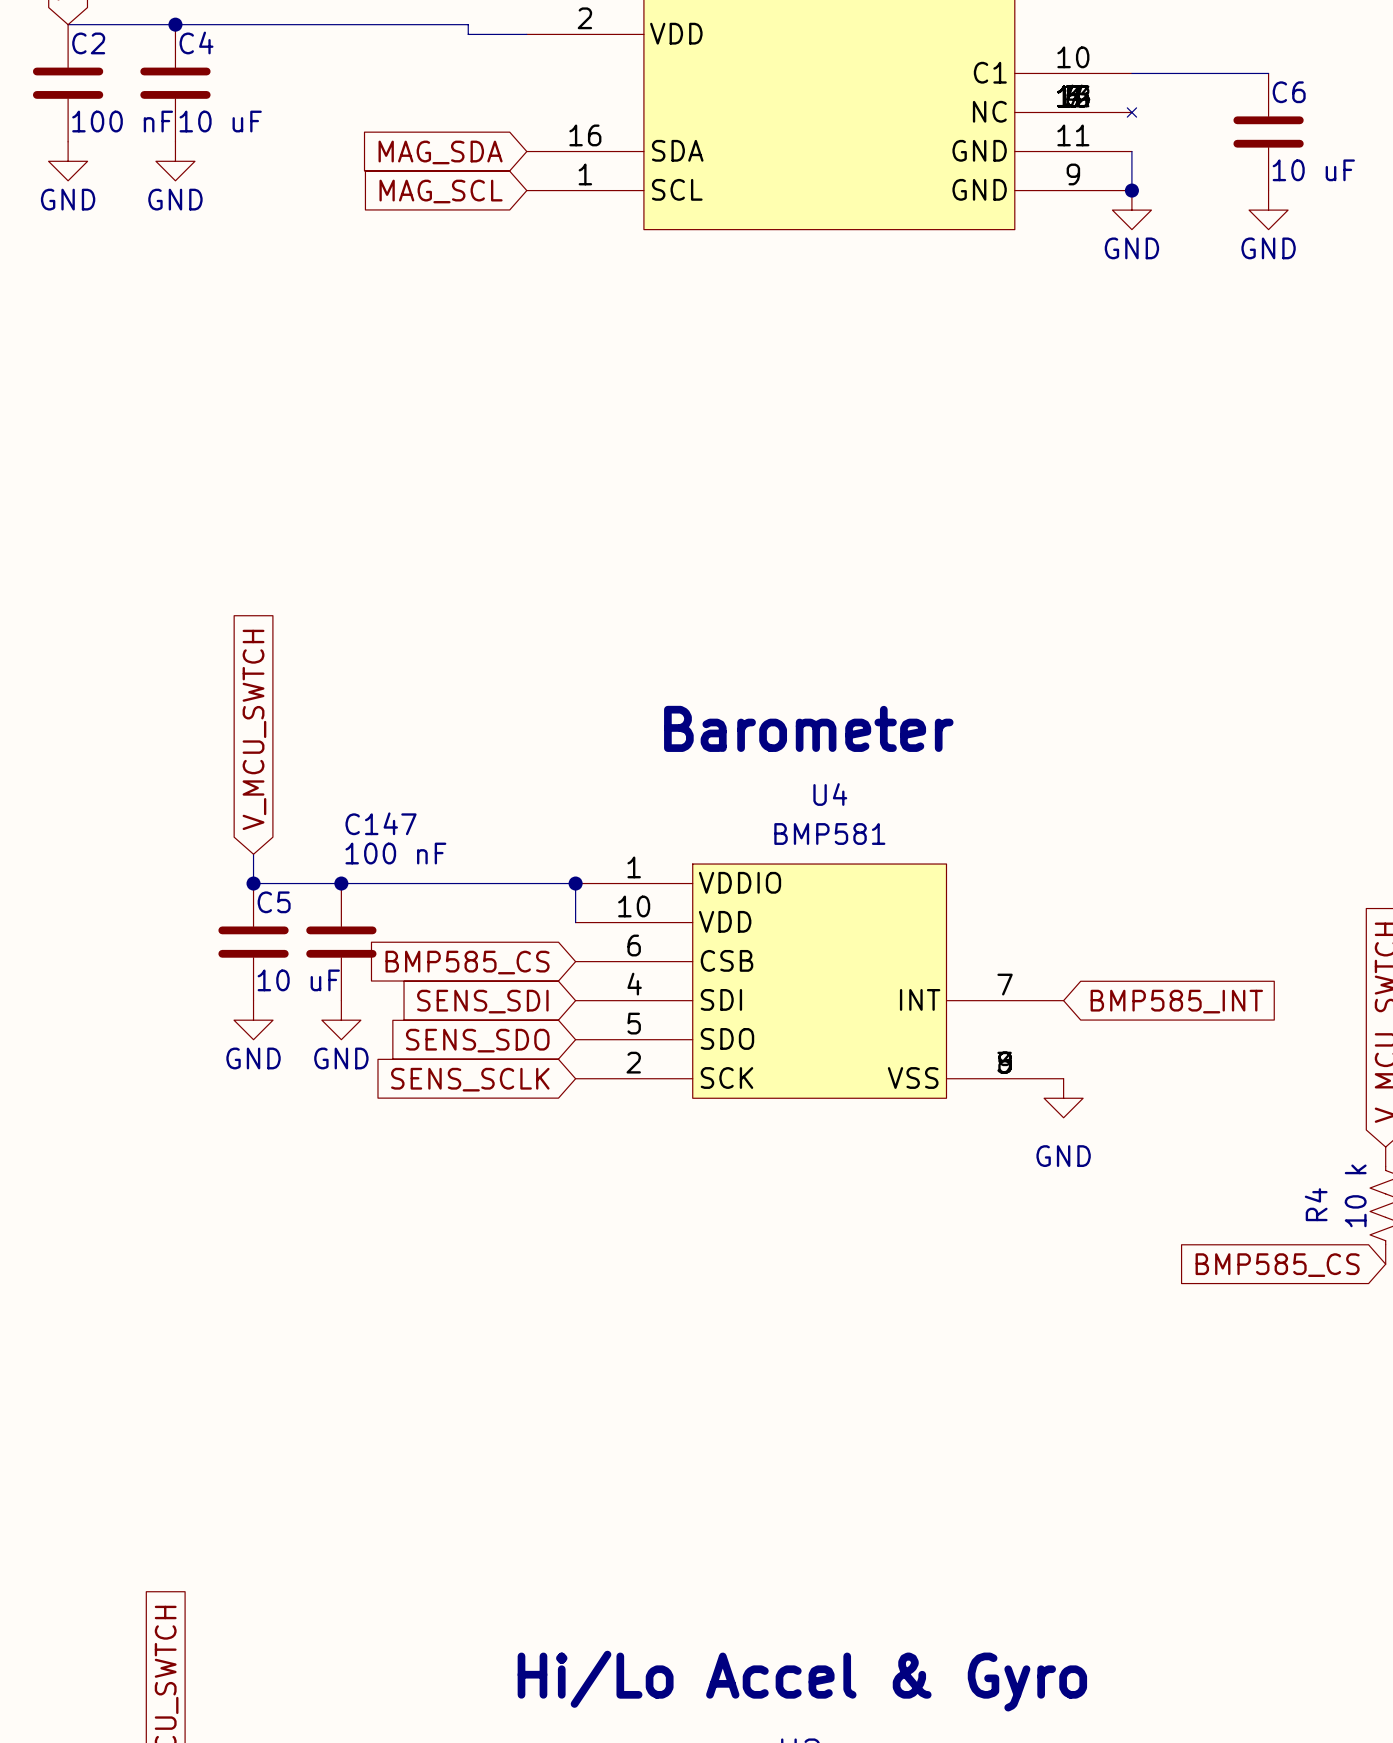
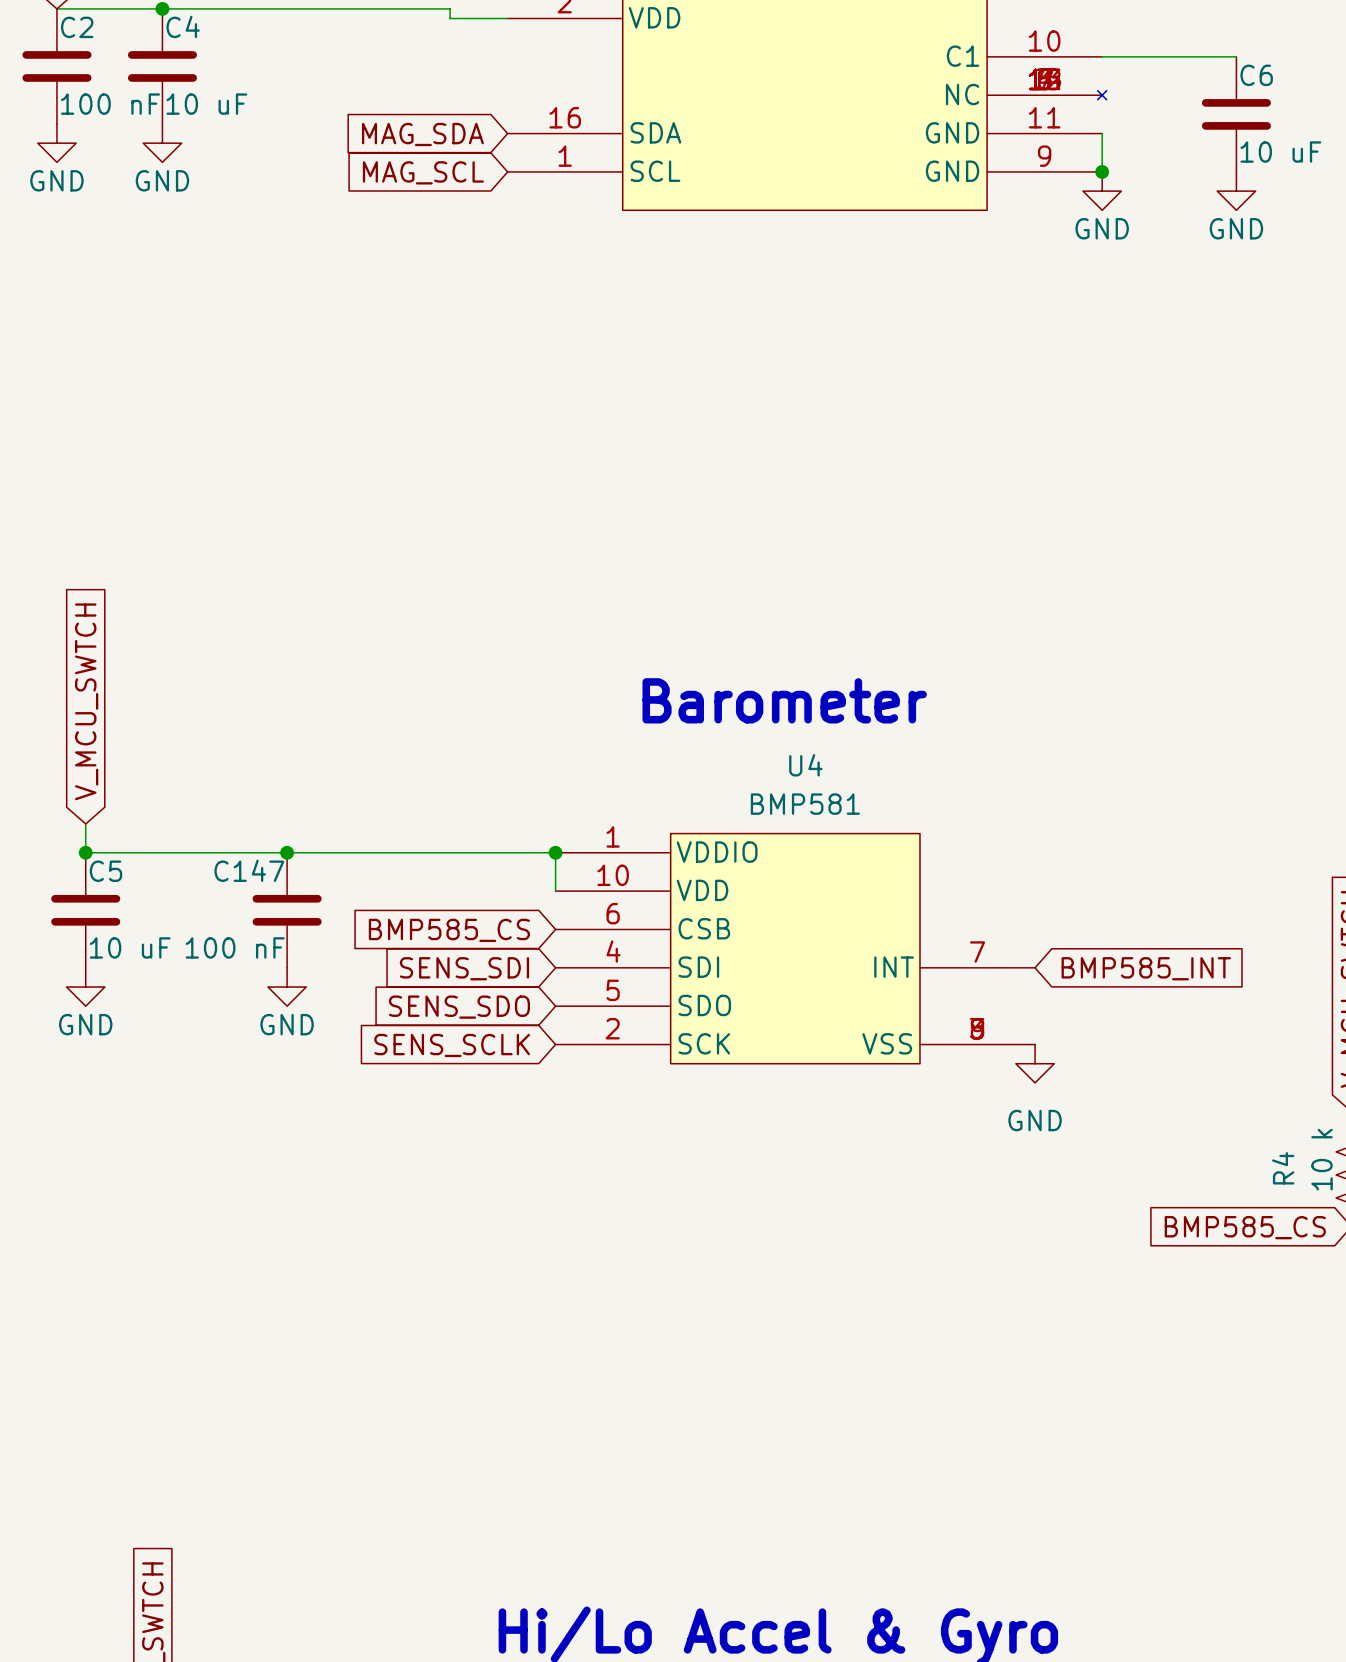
global label position: V_MCU_SWTCH (254, 729) -> V_MCU_SWTCH (86, 701)
C147 name position: C147 (381, 823) -> C147 (249, 870)
C147 value position: 100 nF (395, 853) -> 100 nF (235, 947)
wire: (253, 854) (253, 883) -> (85, 824) (85, 852) (239, 852)
junction: none -> (85, 852)
junction: (253, 883) -> none
junction: none -> (287, 852)
junction: (341, 883) -> none
C5 position: (253, 942) -> (85, 910)
C147 position: (341, 942) -> (287, 910)
power symbol: none -> GND (85, 987)
power symbol: GND (253, 1020) -> none
power symbol: none -> GND (287, 987)
power symbol: GND (341, 1020) -> none

